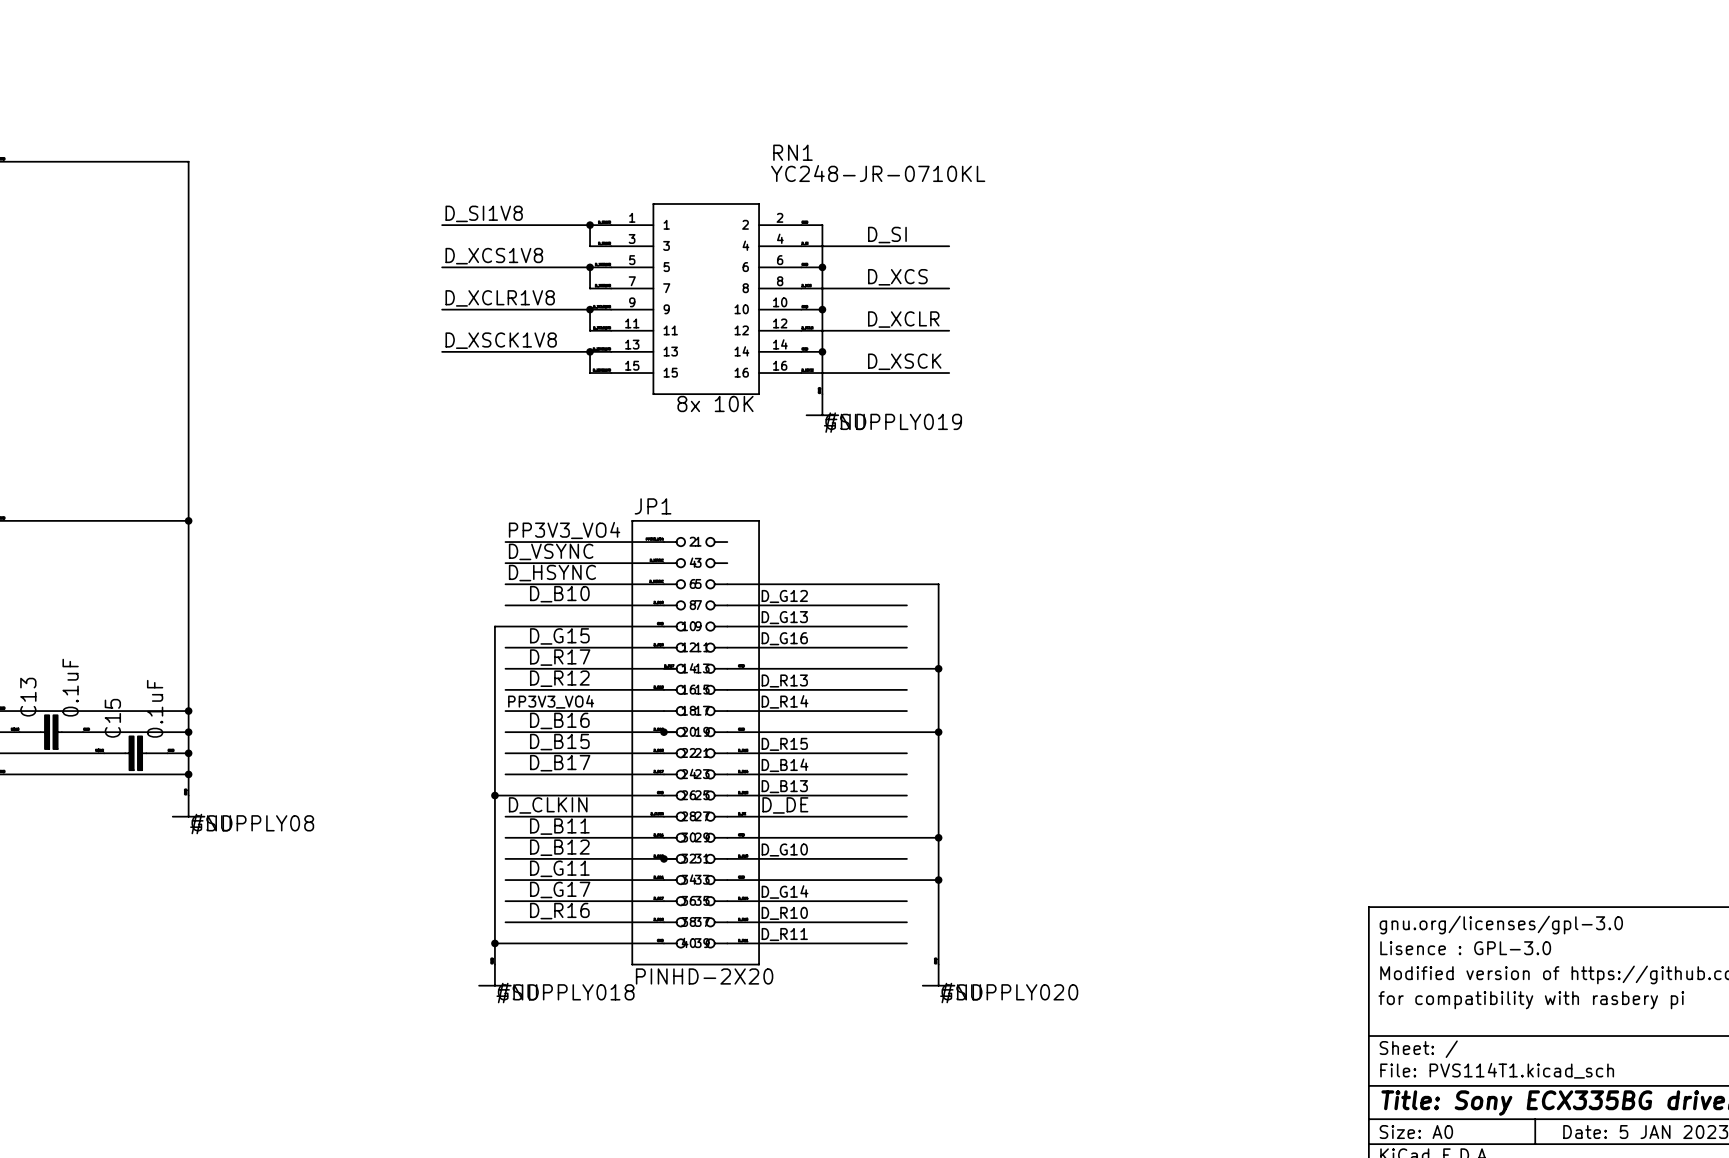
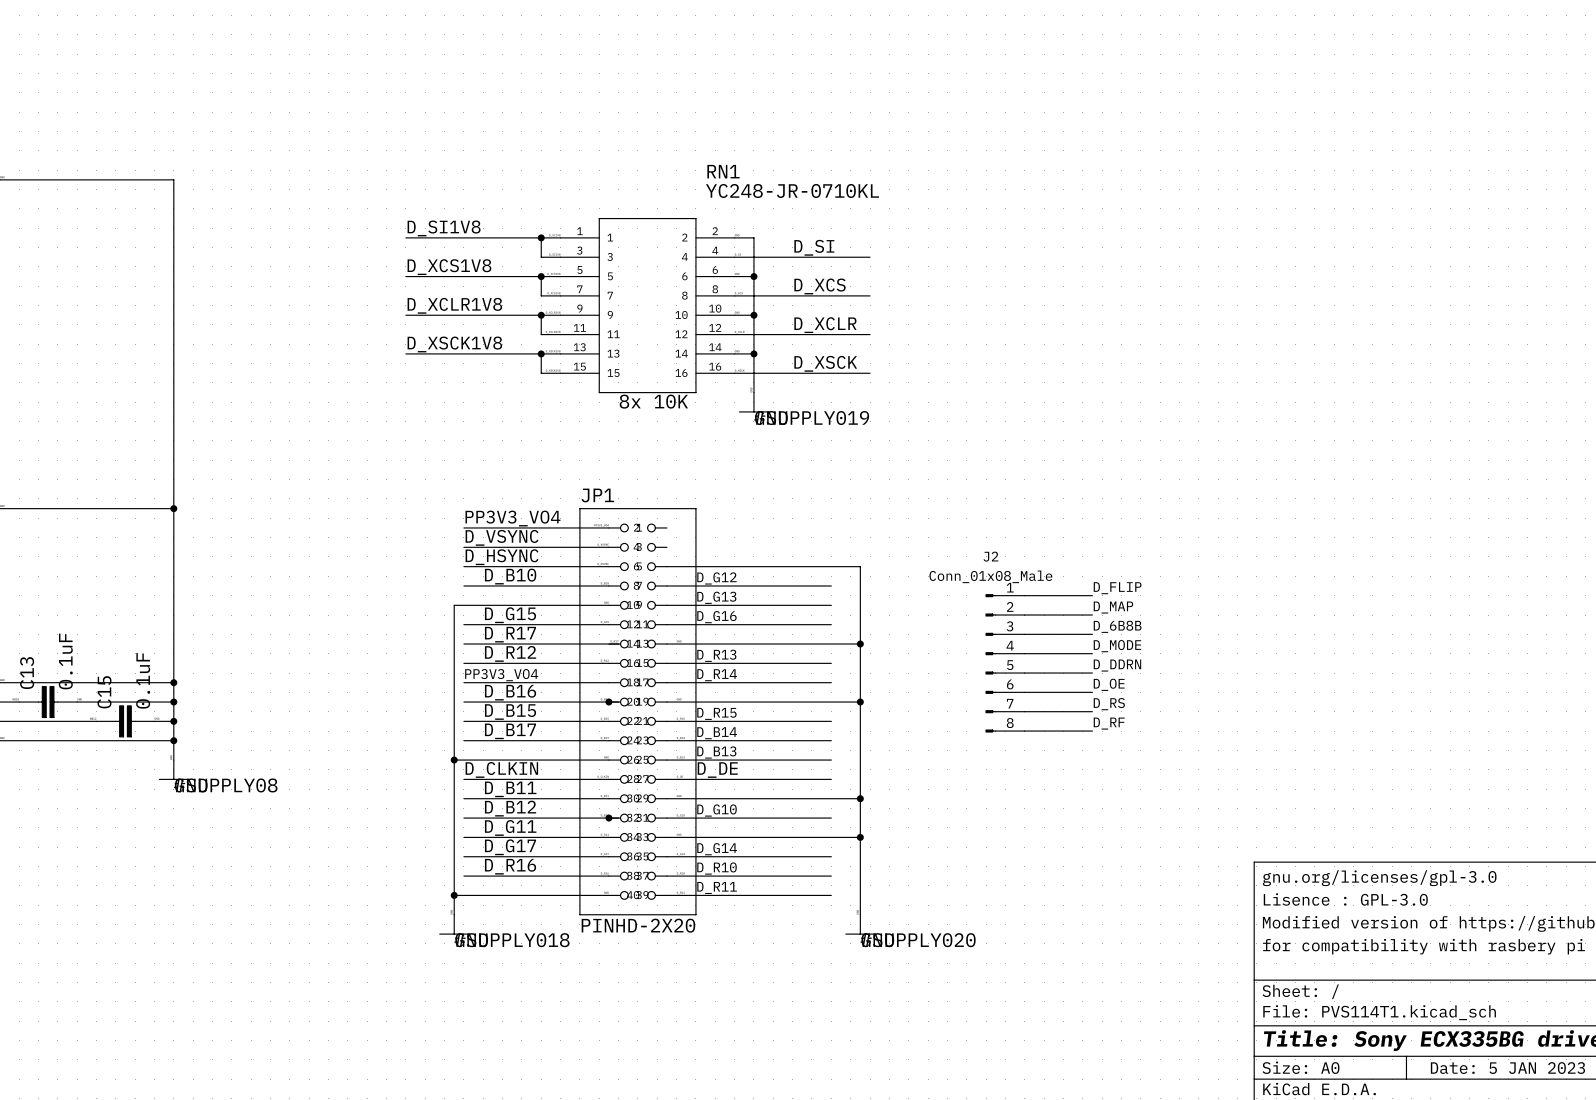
label: none -> D_FLIP (1117, 588)
wire: none -> (1024, 595) (1092, 595)
label: none -> D_MAP (1113, 607)
wire: none -> (1024, 615) (1092, 615)
label: none -> D_6B8B (1117, 626)
wire: none -> (1024, 634) (1092, 634)
label: none -> D_MODE (1117, 646)
wire: none -> (1024, 653) (1092, 653)
J2: none -> Conn_01x08_Male (1005, 663)
label: none -> D_DDRN (1117, 665)
wire: none -> (1024, 673) (1092, 673)
label: none -> D_OE (1109, 684)
wire: none -> (1024, 692) (1092, 692)
label: none -> D_RS (1109, 704)
wire: none -> (1024, 711) (1092, 711)
label: none -> D_RF (1109, 723)
wire: none -> (1024, 731) (1092, 731)

